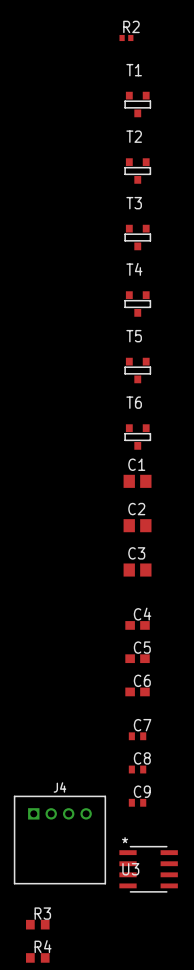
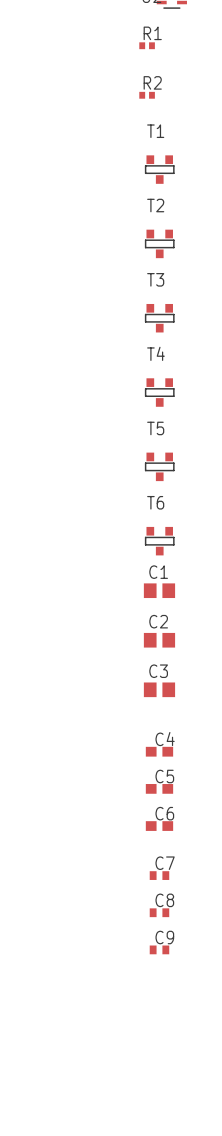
J4: (59, 840) -> none
U3: (148, 869) -> none
R3: (37, 924) -> none
R4: (37, 957) -> none

